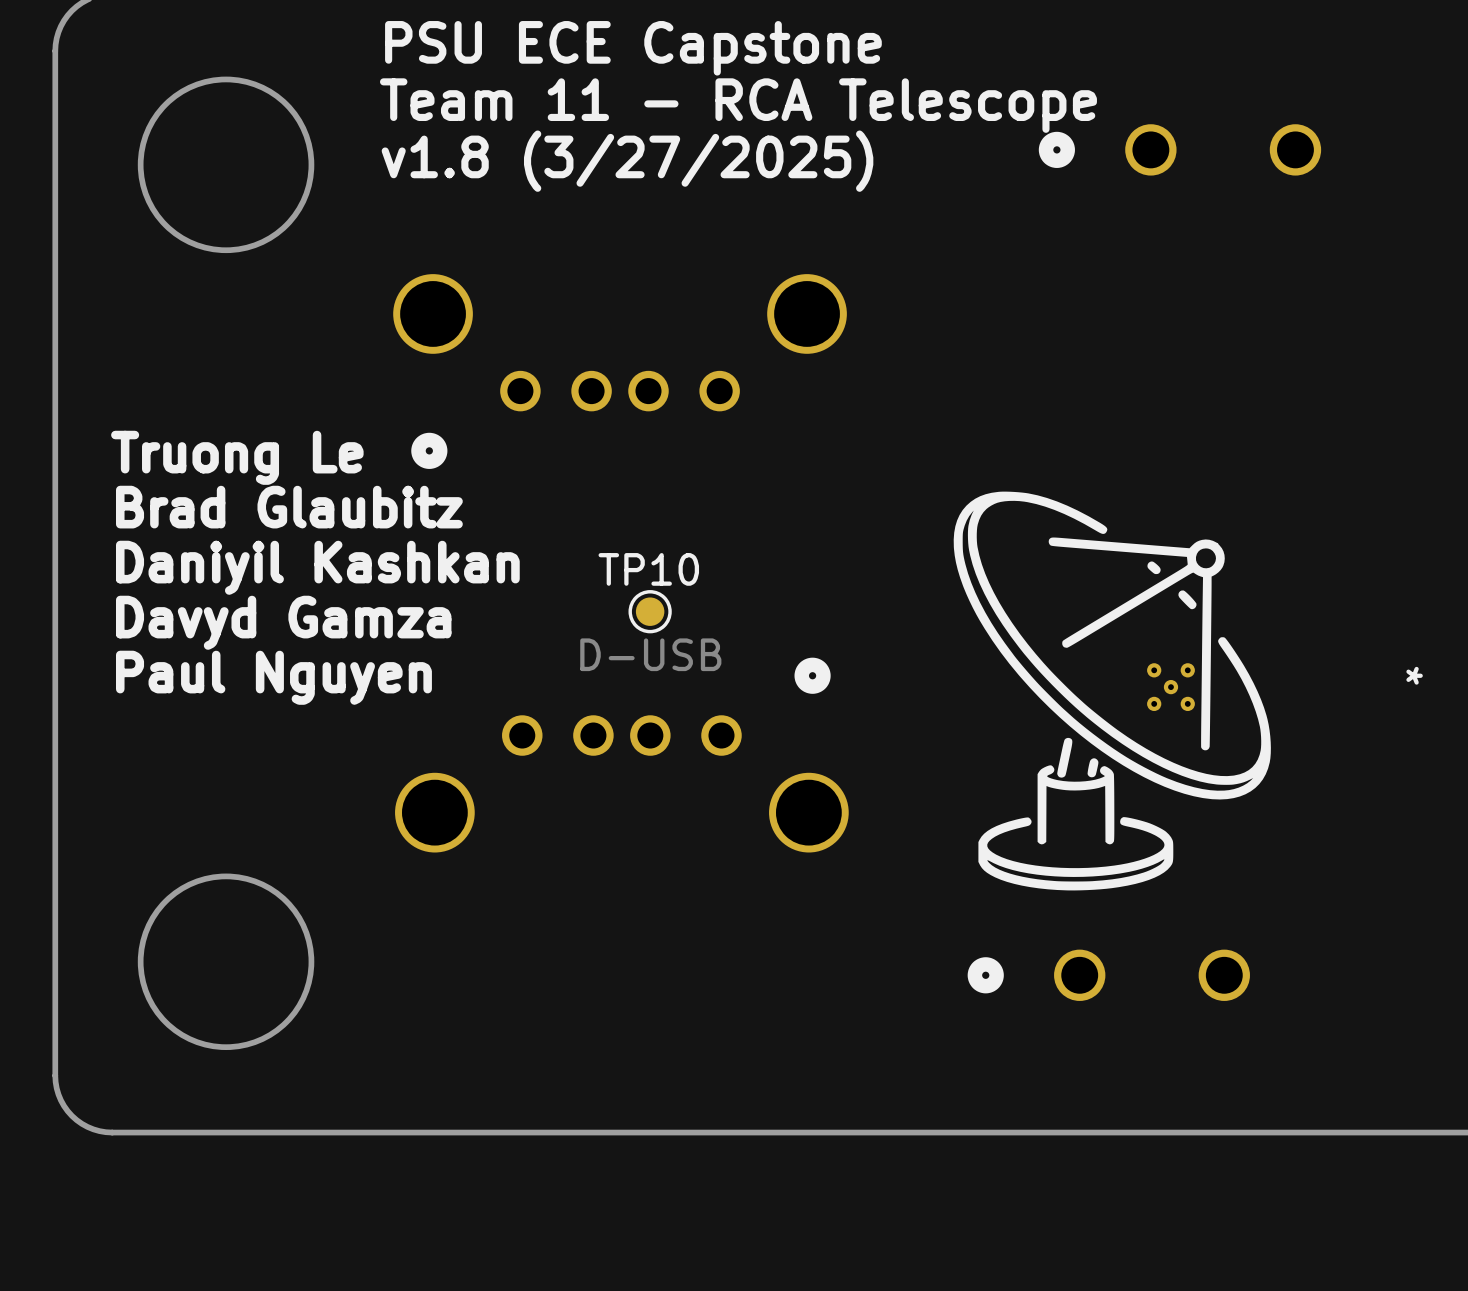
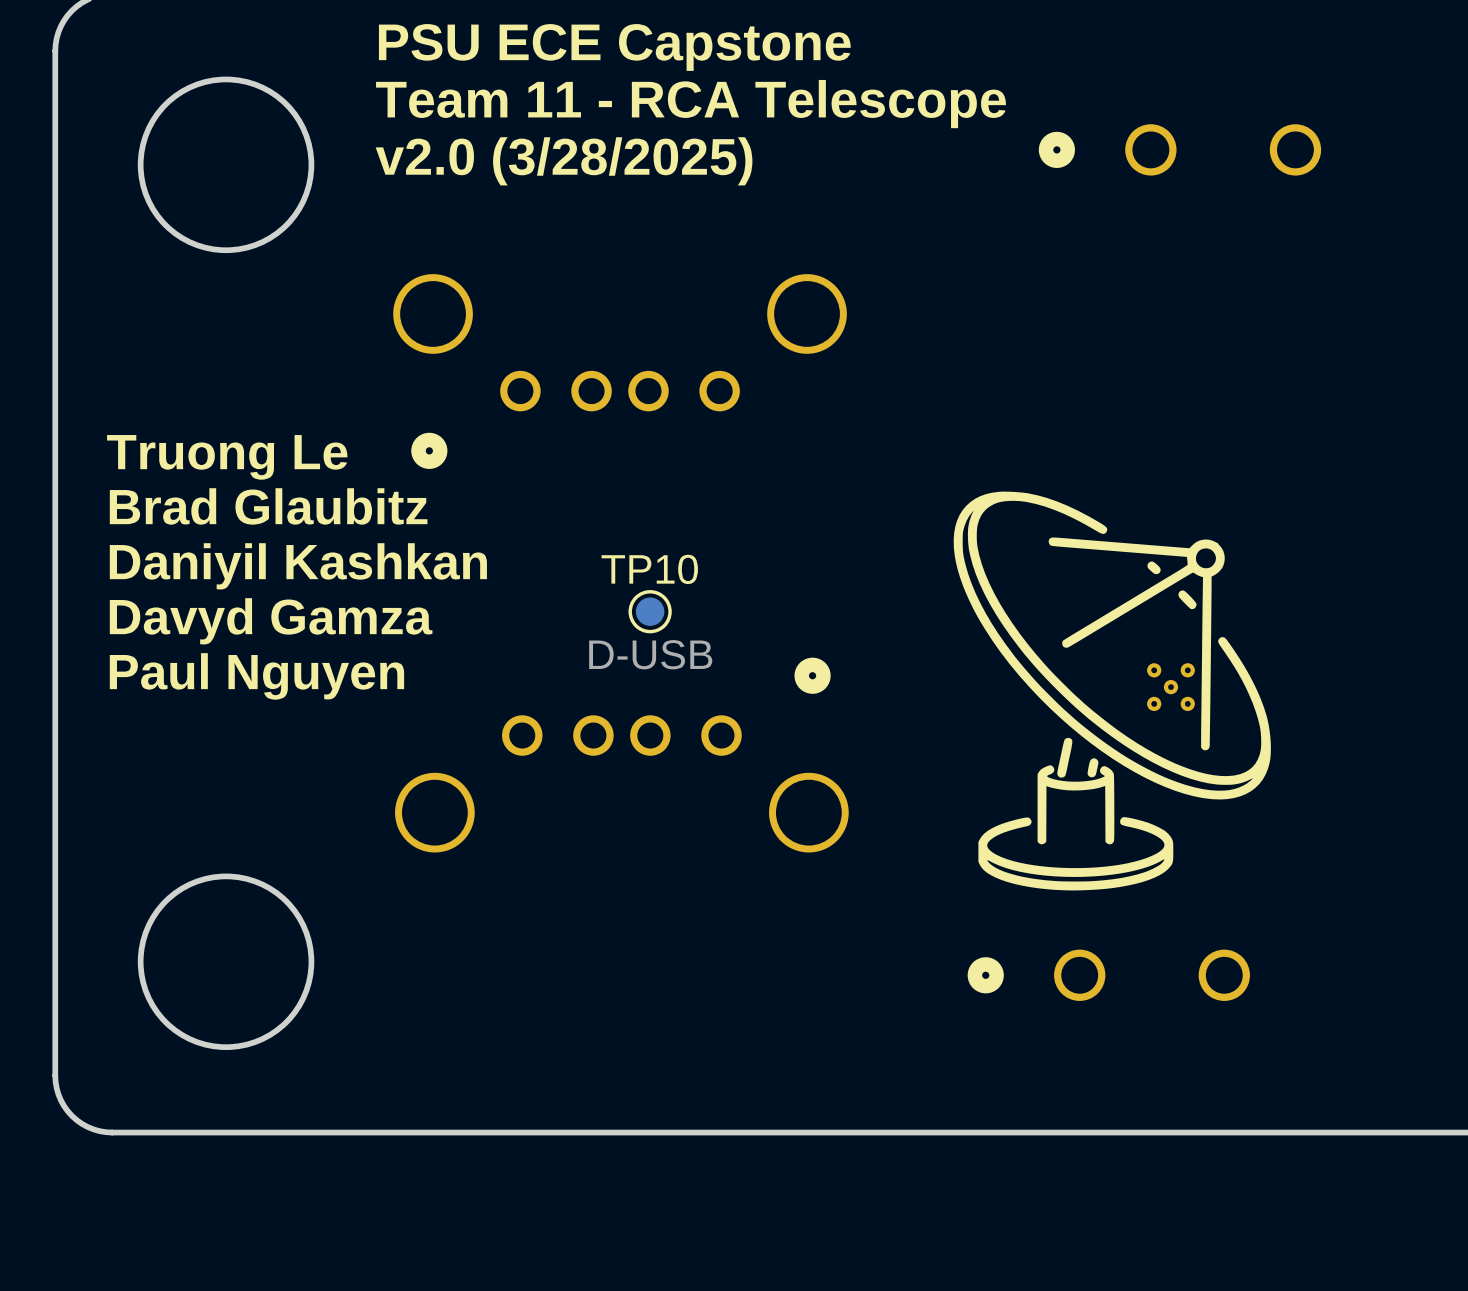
text: v1.8 (3/27/2025) (627, 161) -> v2.0 (3/28/2025) (564, 161)
part: (1414, 675) -> none

